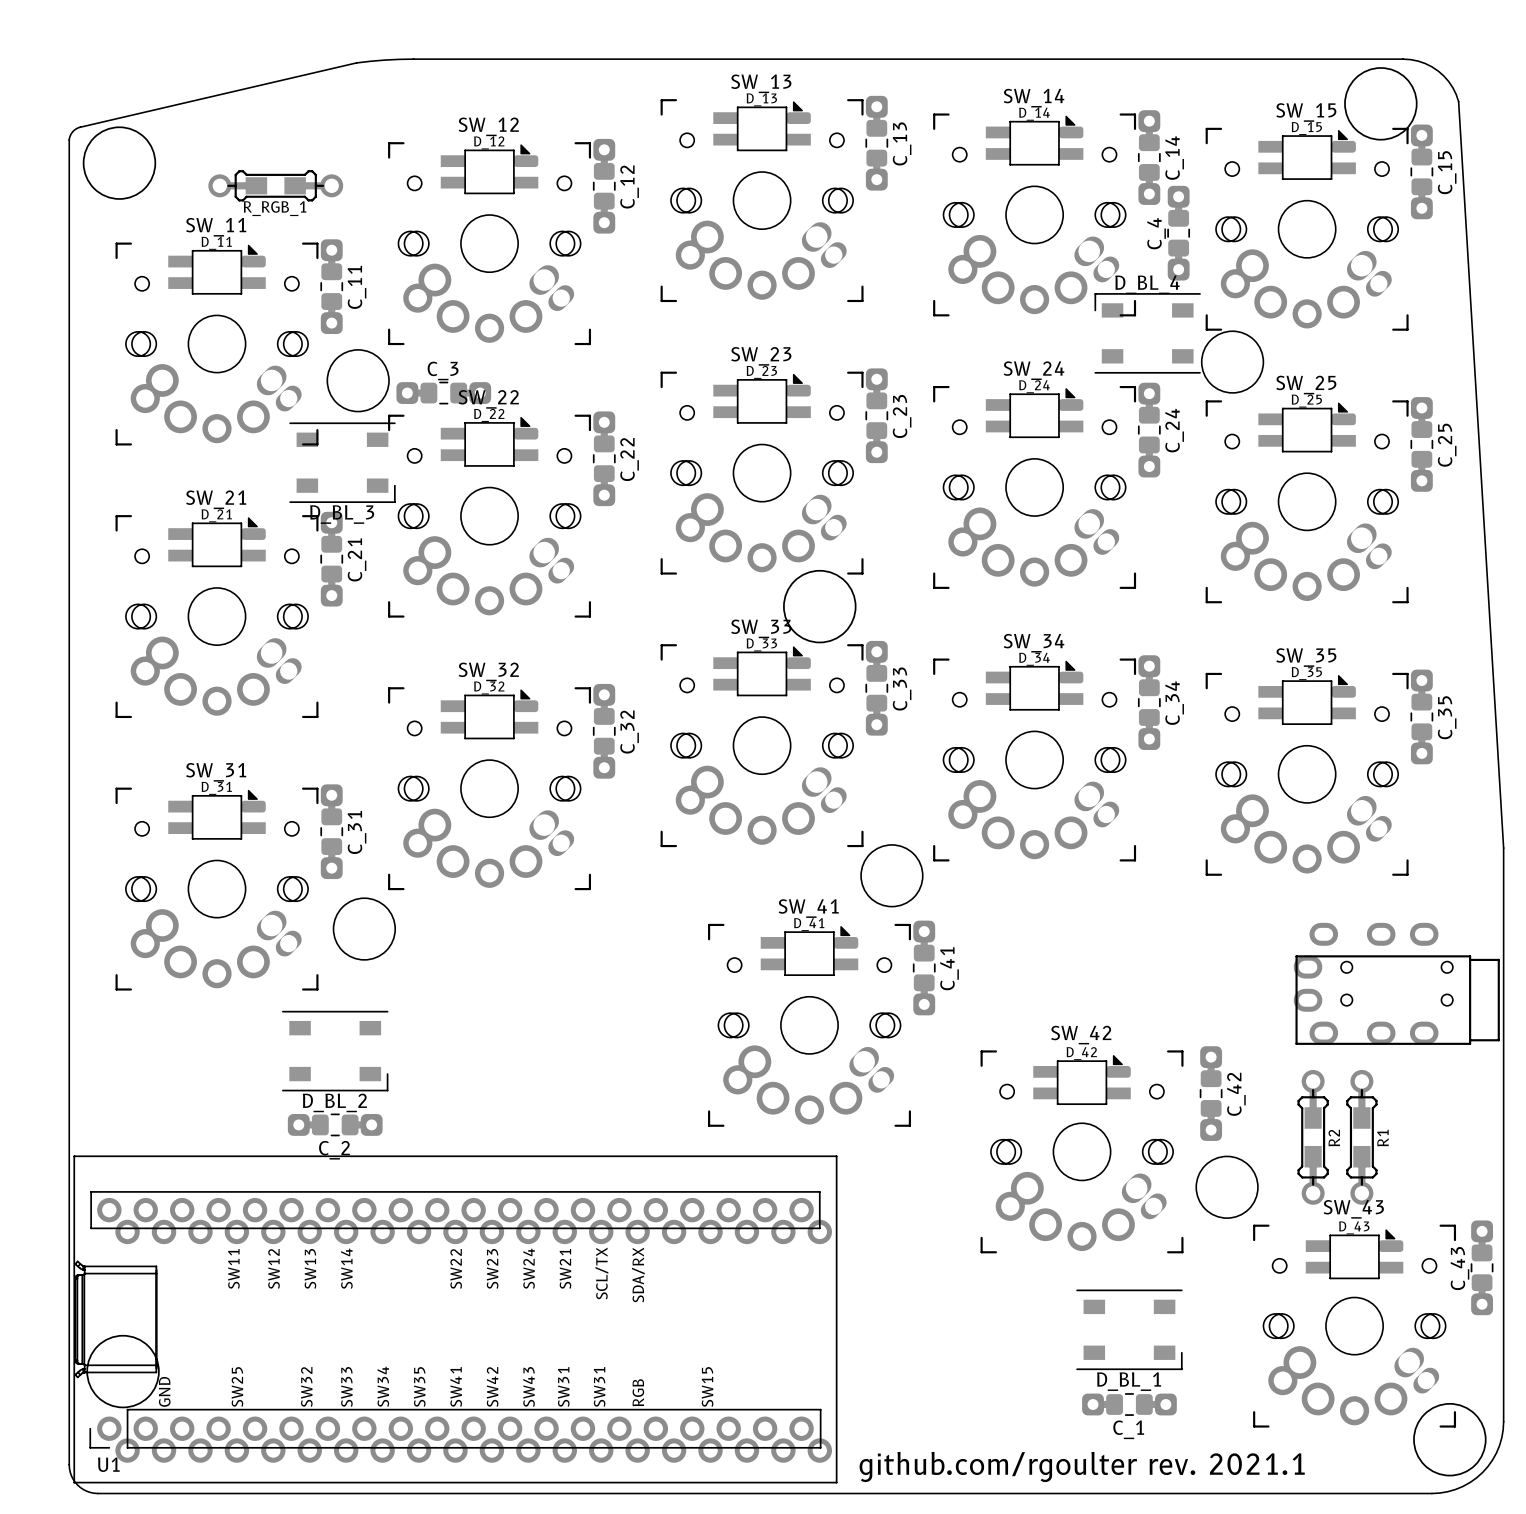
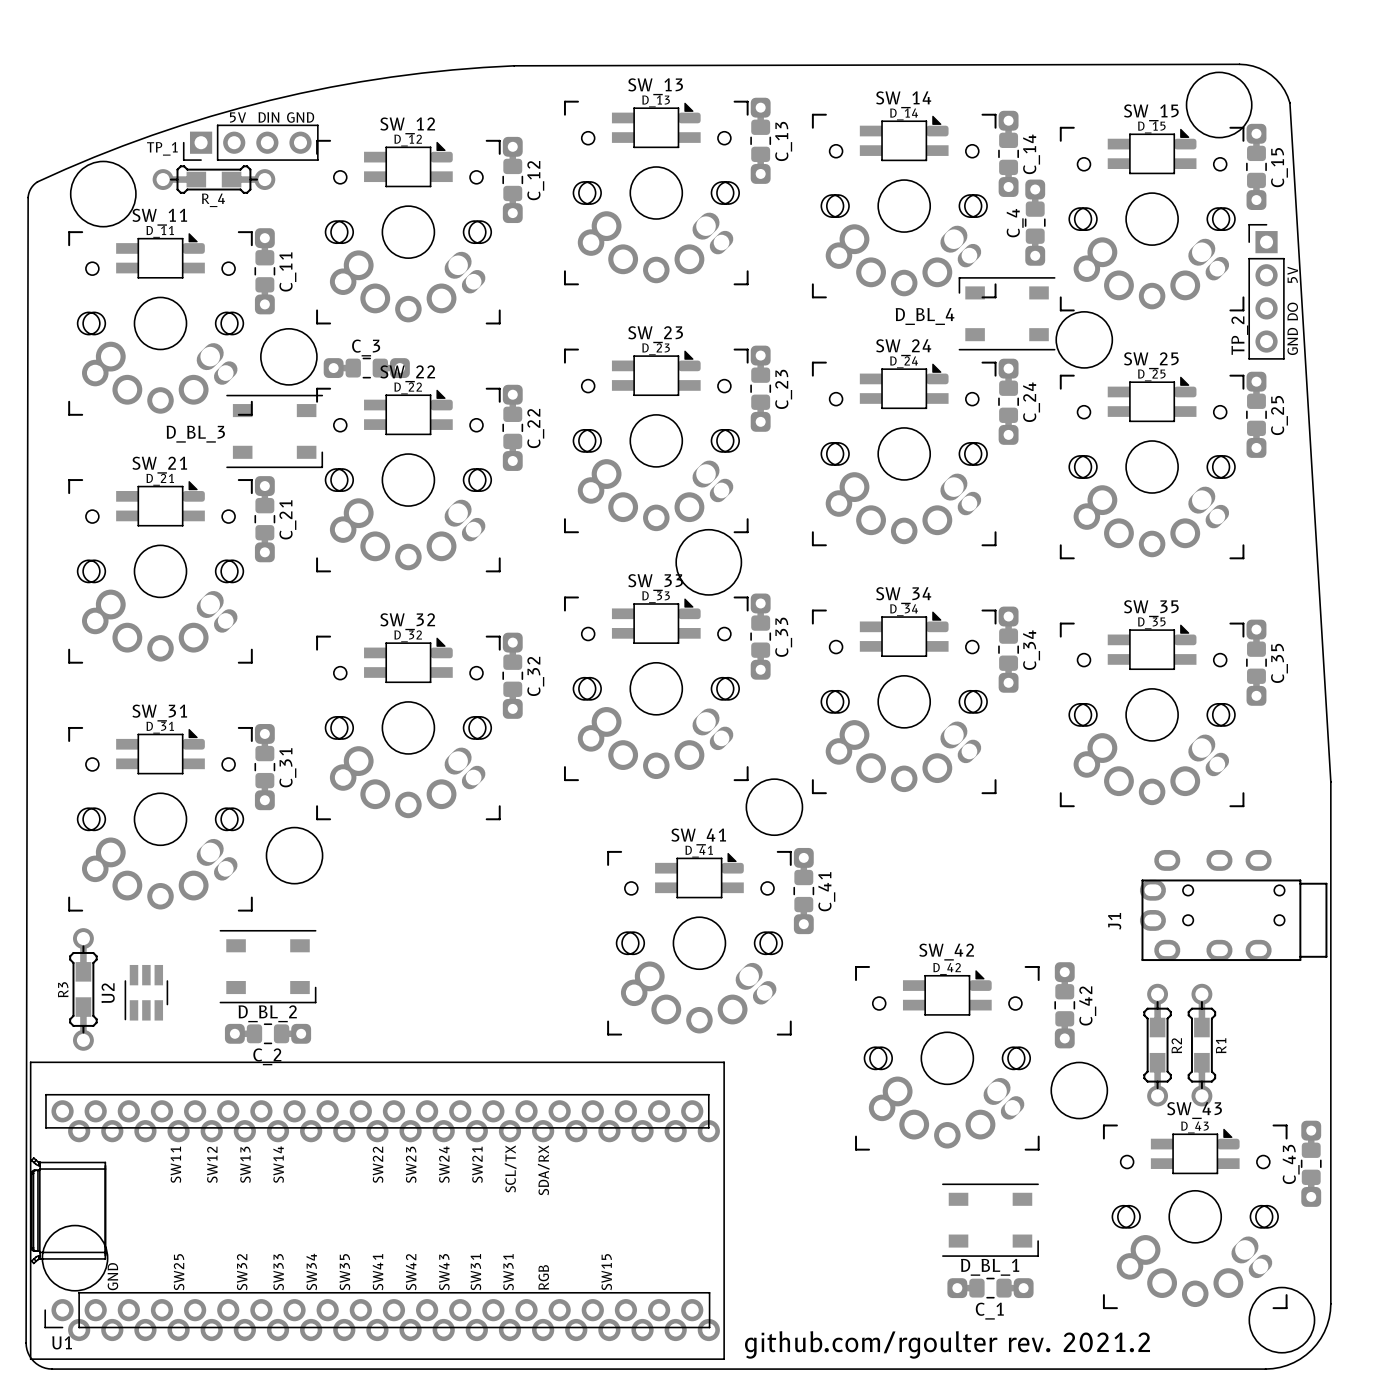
board edge: (1403, 59) (385, 60) (356, 62) (80, 127) (72, 131) (69, 139) (69, 1464) -> (1239, 64) (514, 65) (452, 69) (360, 81) (300, 93) (240, 108) (181, 125) (122, 145) (65, 169) (33, 184) (28, 197) (26, 1342)
text: none -> 5V (238, 117)
text: none -> DIN (268, 117)
text: none -> GND (300, 117)
TP_1: none -> (250, 142)
drawing position: (119, 163) -> (103, 194)
R_RGB_1 name: R_RGB_1 (275, 208) -> R_4 (213, 200)
D_BL_4 name position: D_BL_4 (1147, 284) -> D_BL_4 (925, 316)
text: none -> 5V (1292, 274)
TP_2: none -> (1266, 291)
text: none -> DO (1292, 311)
text: none -> GND (1292, 341)
D_BL_3 name position: D_BL_3 (342, 514) -> D_BL_3 (195, 434)
J1 name: none -> J1 (1114, 921)
R3: none -> (83, 989)
U2: none -> (146, 992)
text: github.com/rgoulter rev. 2021.1 (1082, 1466) -> github.com/rgoulter rev. 2021.2 (947, 1344)

